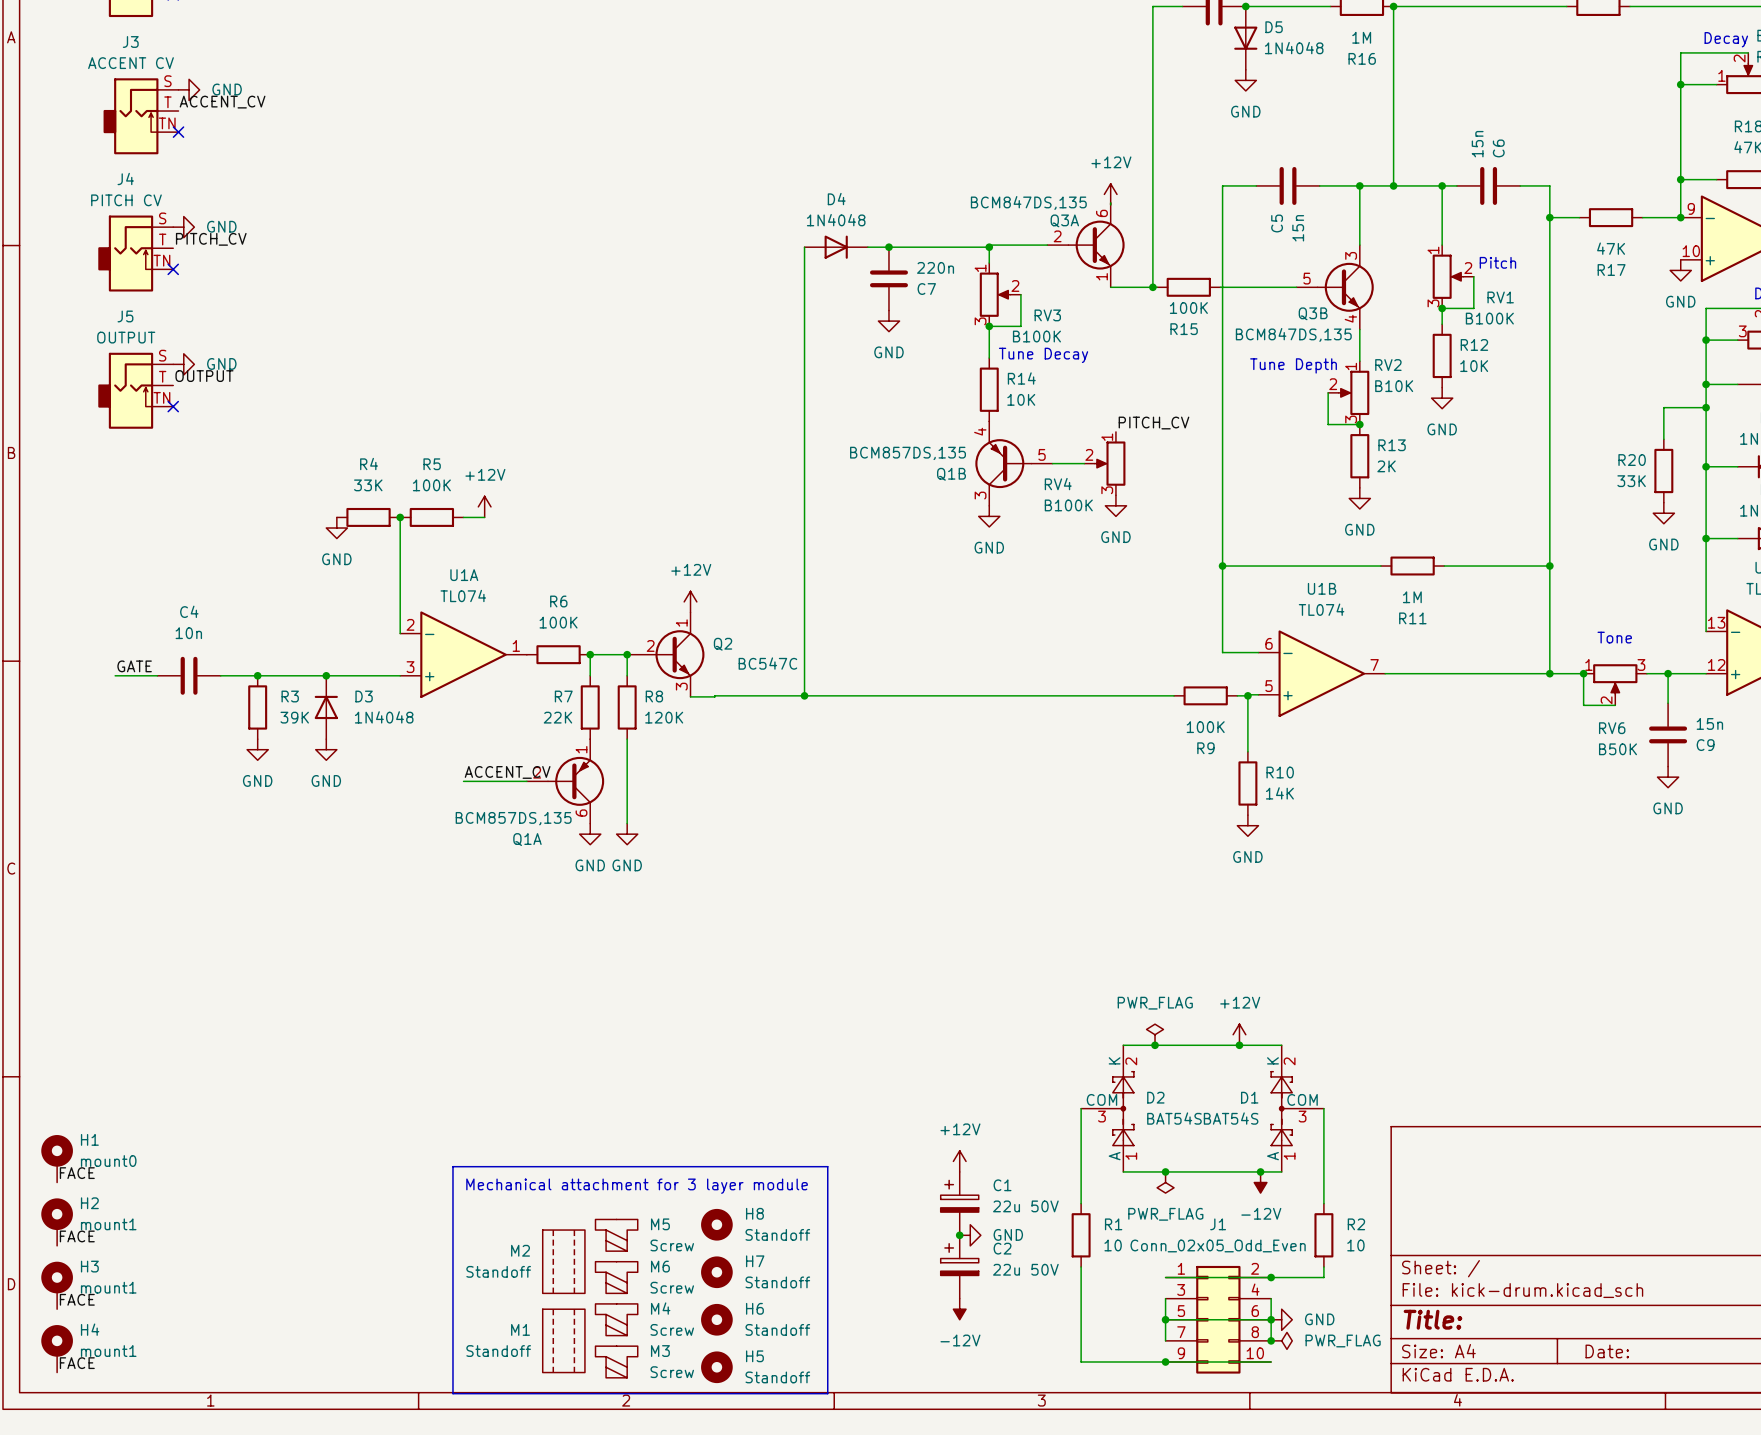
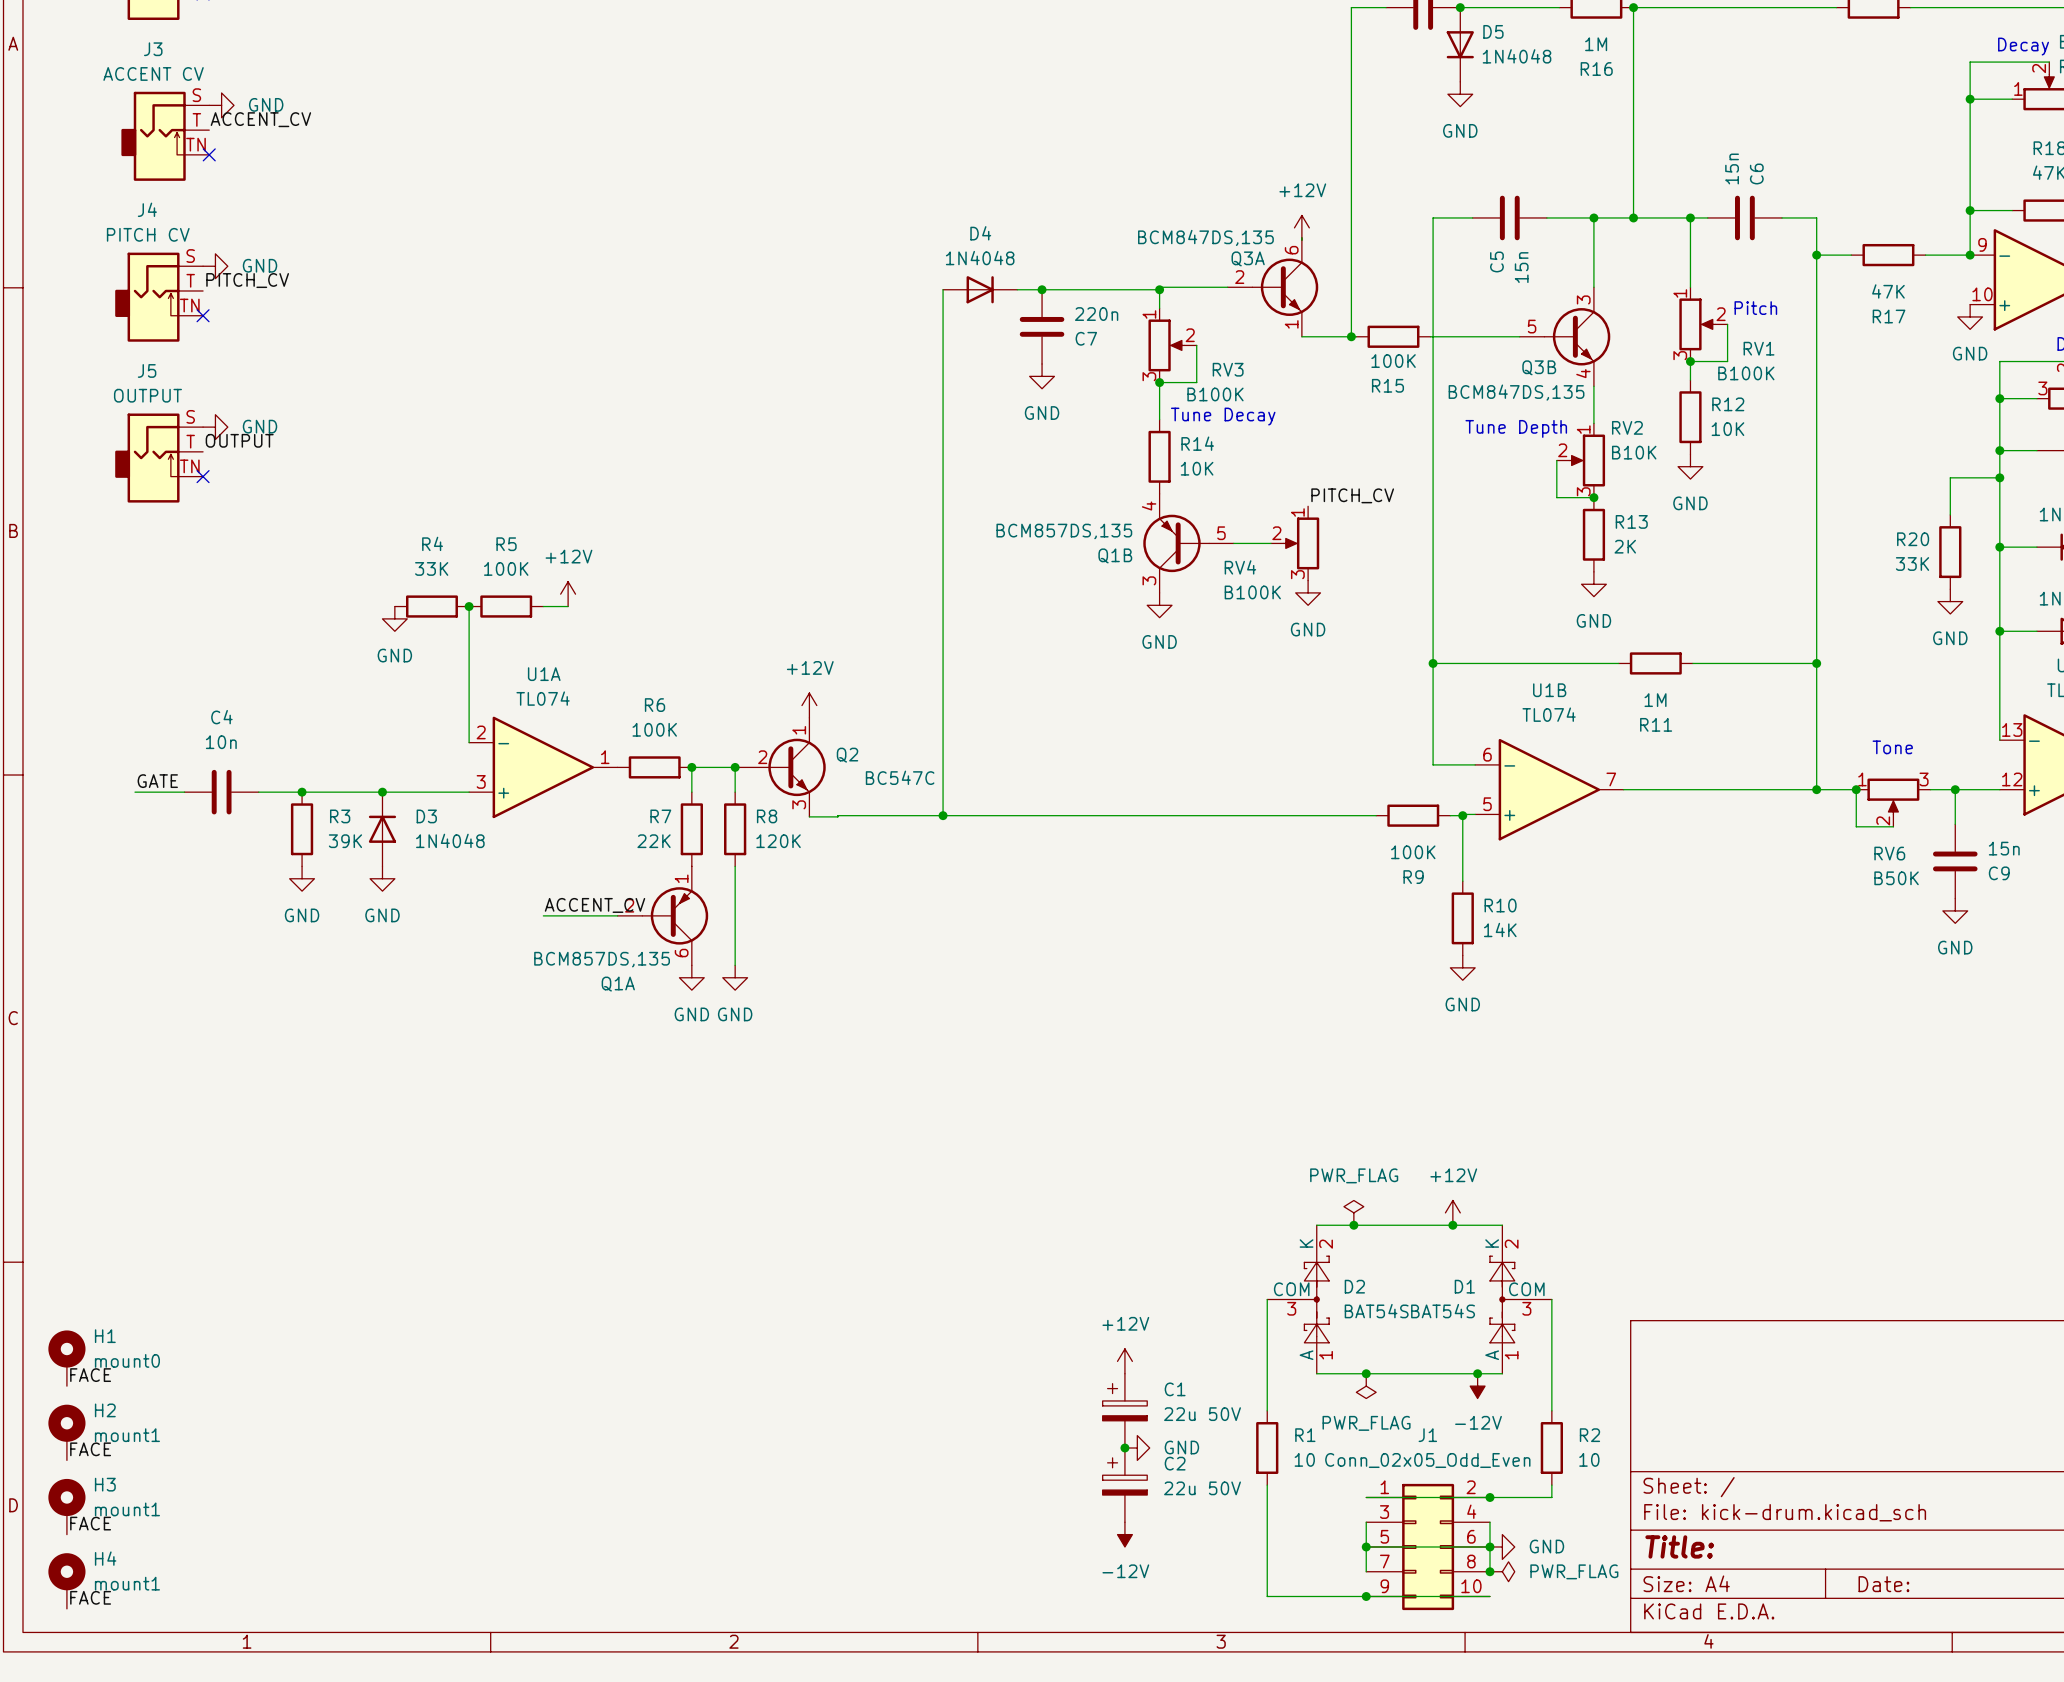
line: (452, 1166) (827, 1166) (827, 1393) (452, 1393) (452, 1166) -> none
text: Mechanical attachment for 3 layer module (637, 1186) -> none
H8: Standoff (716, 1224) -> none
M5: Screw (616, 1235) -> none
M2: Standoff (563, 1261) -> none
H7: Standoff (716, 1272) -> none
M6: Screw (616, 1277) -> none
M4: Screw (616, 1319) -> none
H6: Standoff (716, 1319) -> none
M1: Standoff (563, 1340) -> none
M3: Screw (616, 1361) -> none
H5: Standoff (716, 1367) -> none

